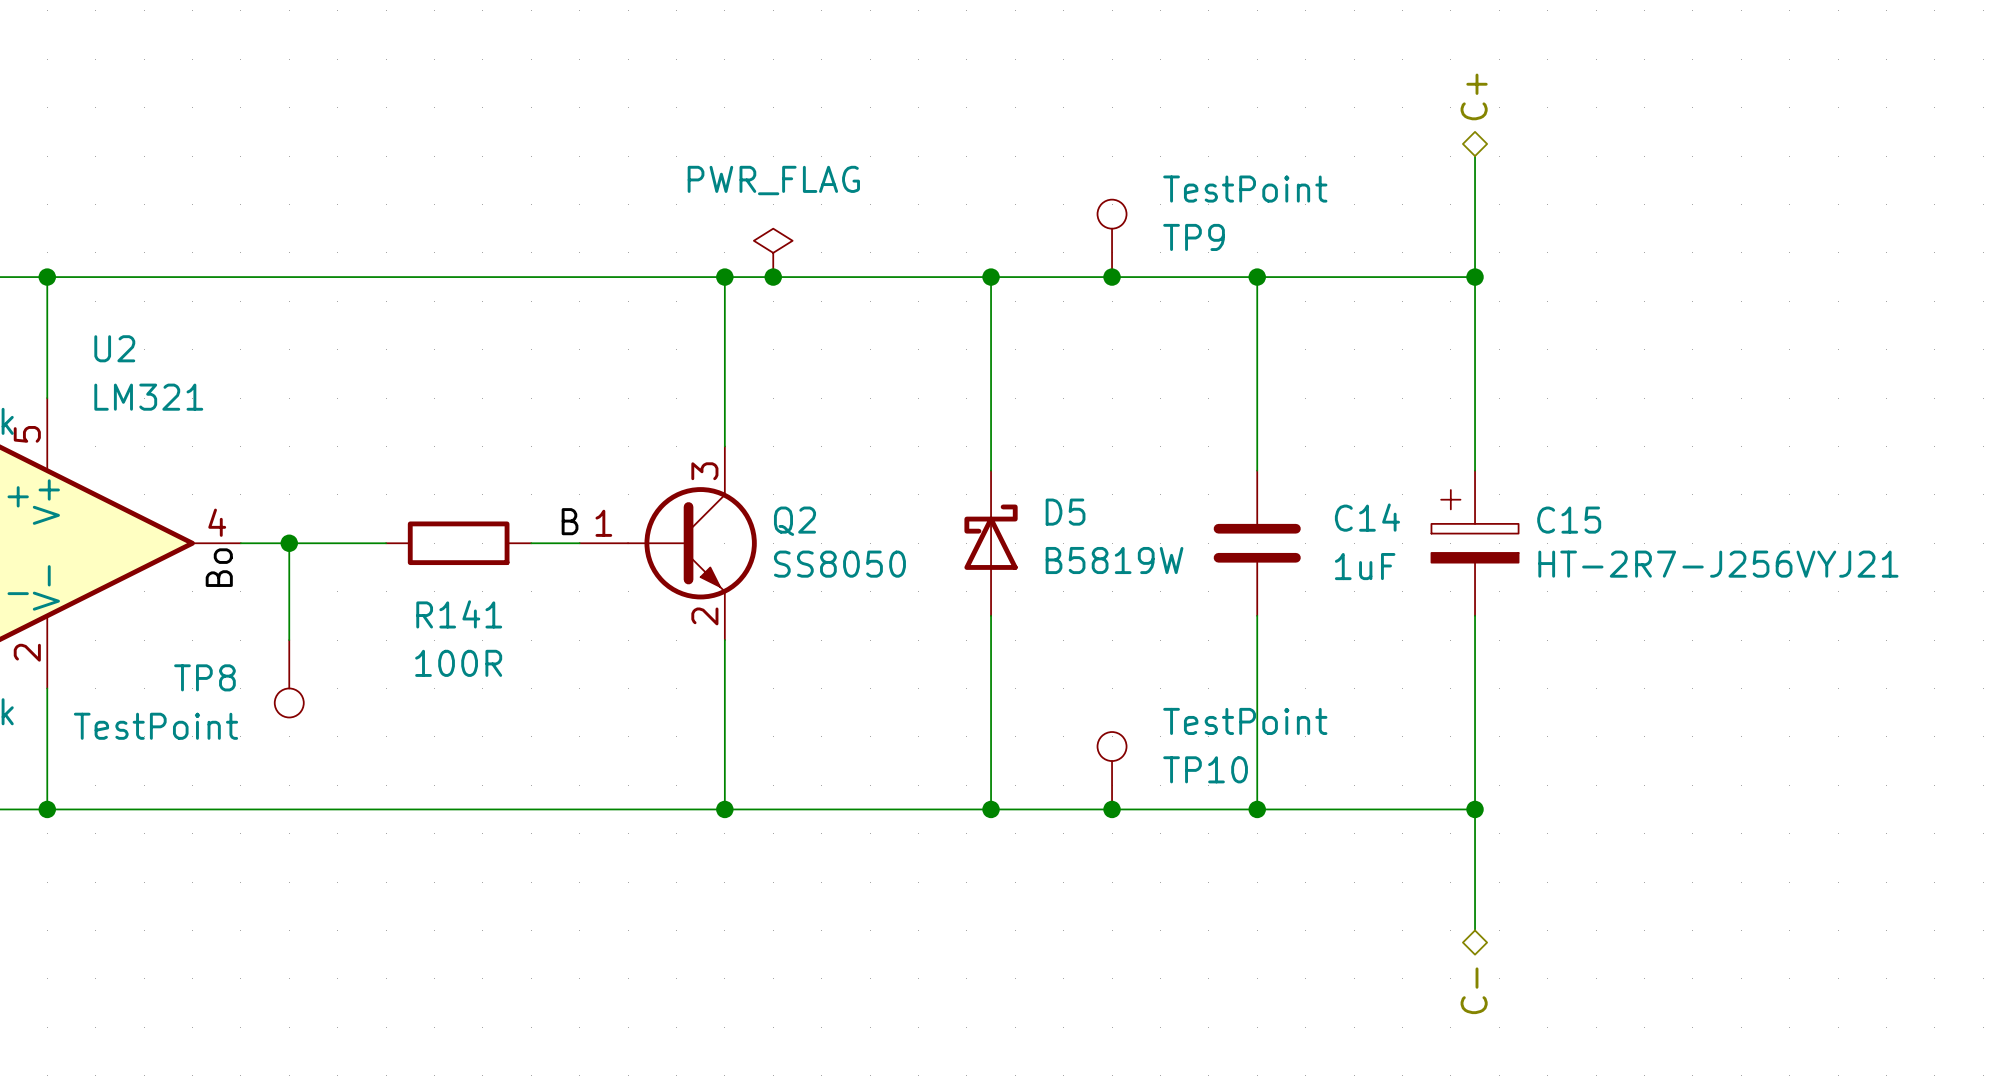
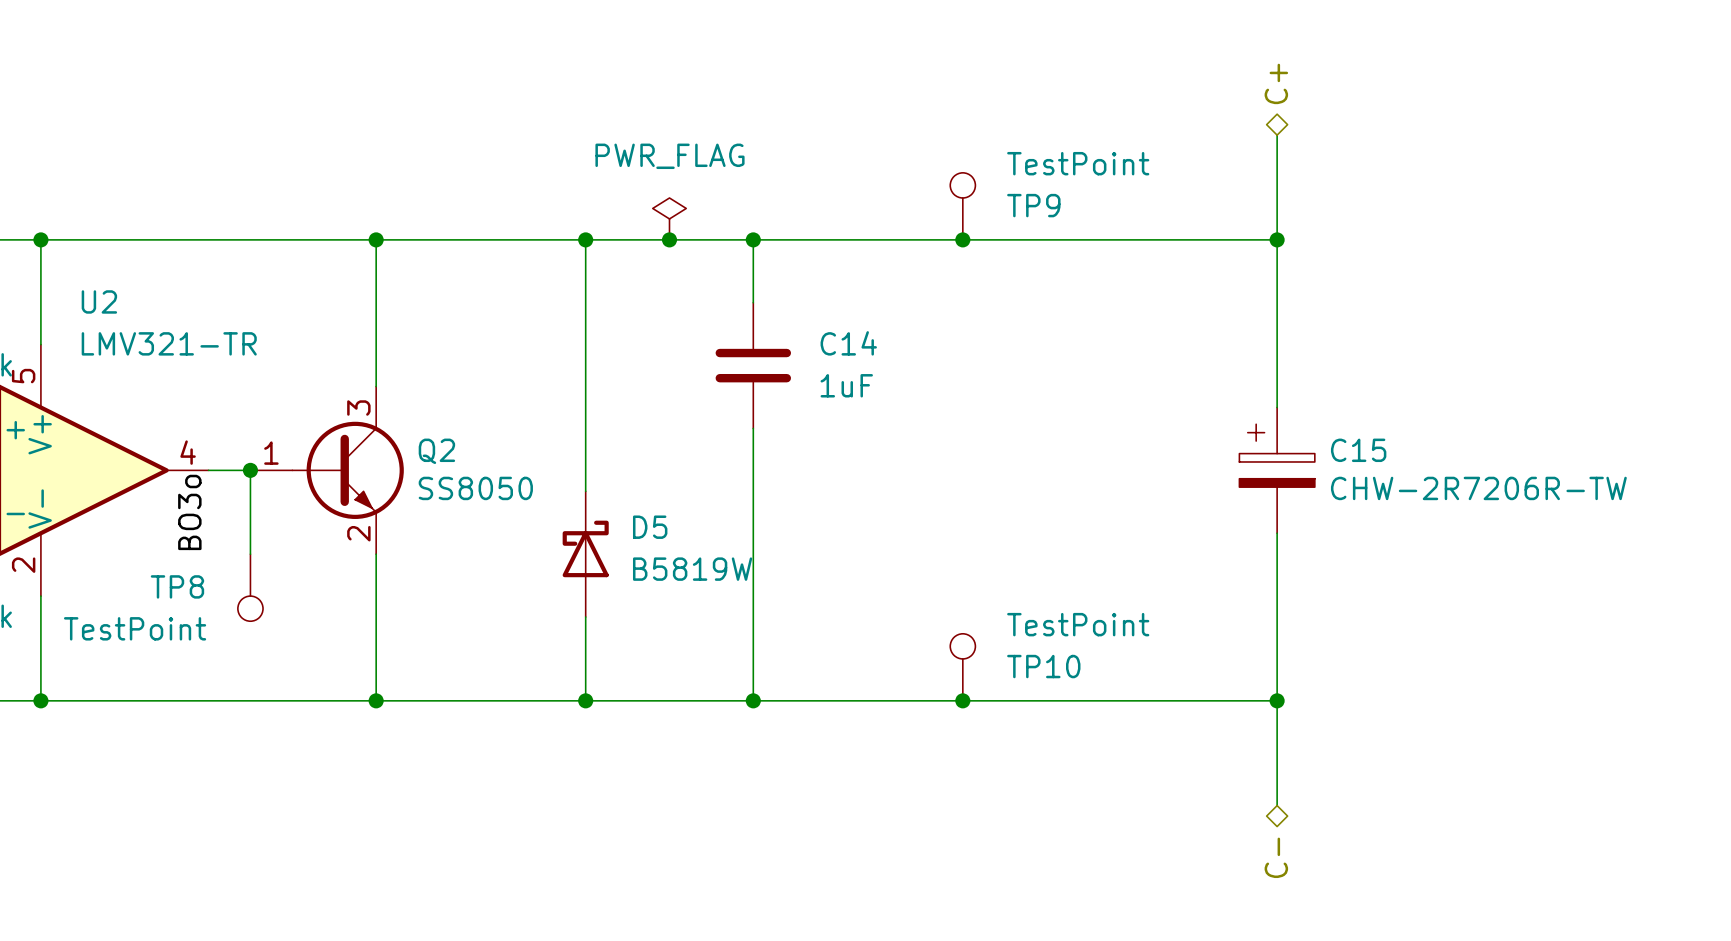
junction: none -> (376, 239)
wire: none -> (585, 239) (585, 491)
wire: (724, 277) (724, 446) -> (376, 239) (376, 386)
junction position: (724, 277) -> (585, 239)
wire: none -> (753, 239) (753, 302)
junction: none -> (753, 239)
wire: (991, 277) (991, 470) -> none
junction: (991, 277) -> none
wire: (1257, 277) (1257, 470) -> none
junction: (1257, 277) -> none
U2 value: LM321 (148, 397) -> LMV321-TR (169, 343)
wire: none -> (753, 428) (753, 700)
label: B (570, 521) -> none
R141: 100R (458, 543) -> none
wire: (531, 543) (579, 543) -> none
Q2 position: (668, 543) -> (327, 470)
D5 position: (991, 543) -> (585, 554)
C14 position: (1257, 543) -> (753, 365)
C15 value: HT-2R7-J256VYJ21 (1718, 564) -> CHW-2R7206R-TW (1478, 488)
label: Bo (219, 567) -> BO3o (189, 512)
wire: (991, 615) (991, 809) -> none
wire: (1257, 615) (1257, 809) -> none
wire: (724, 640) (724, 809) -> (376, 554) (376, 700)
wire: none -> (585, 617) (585, 700)
junction: none -> (376, 700)
junction position: (724, 809) -> (585, 700)
junction: none -> (753, 700)
junction: (991, 809) -> none
junction: (1257, 809) -> none

